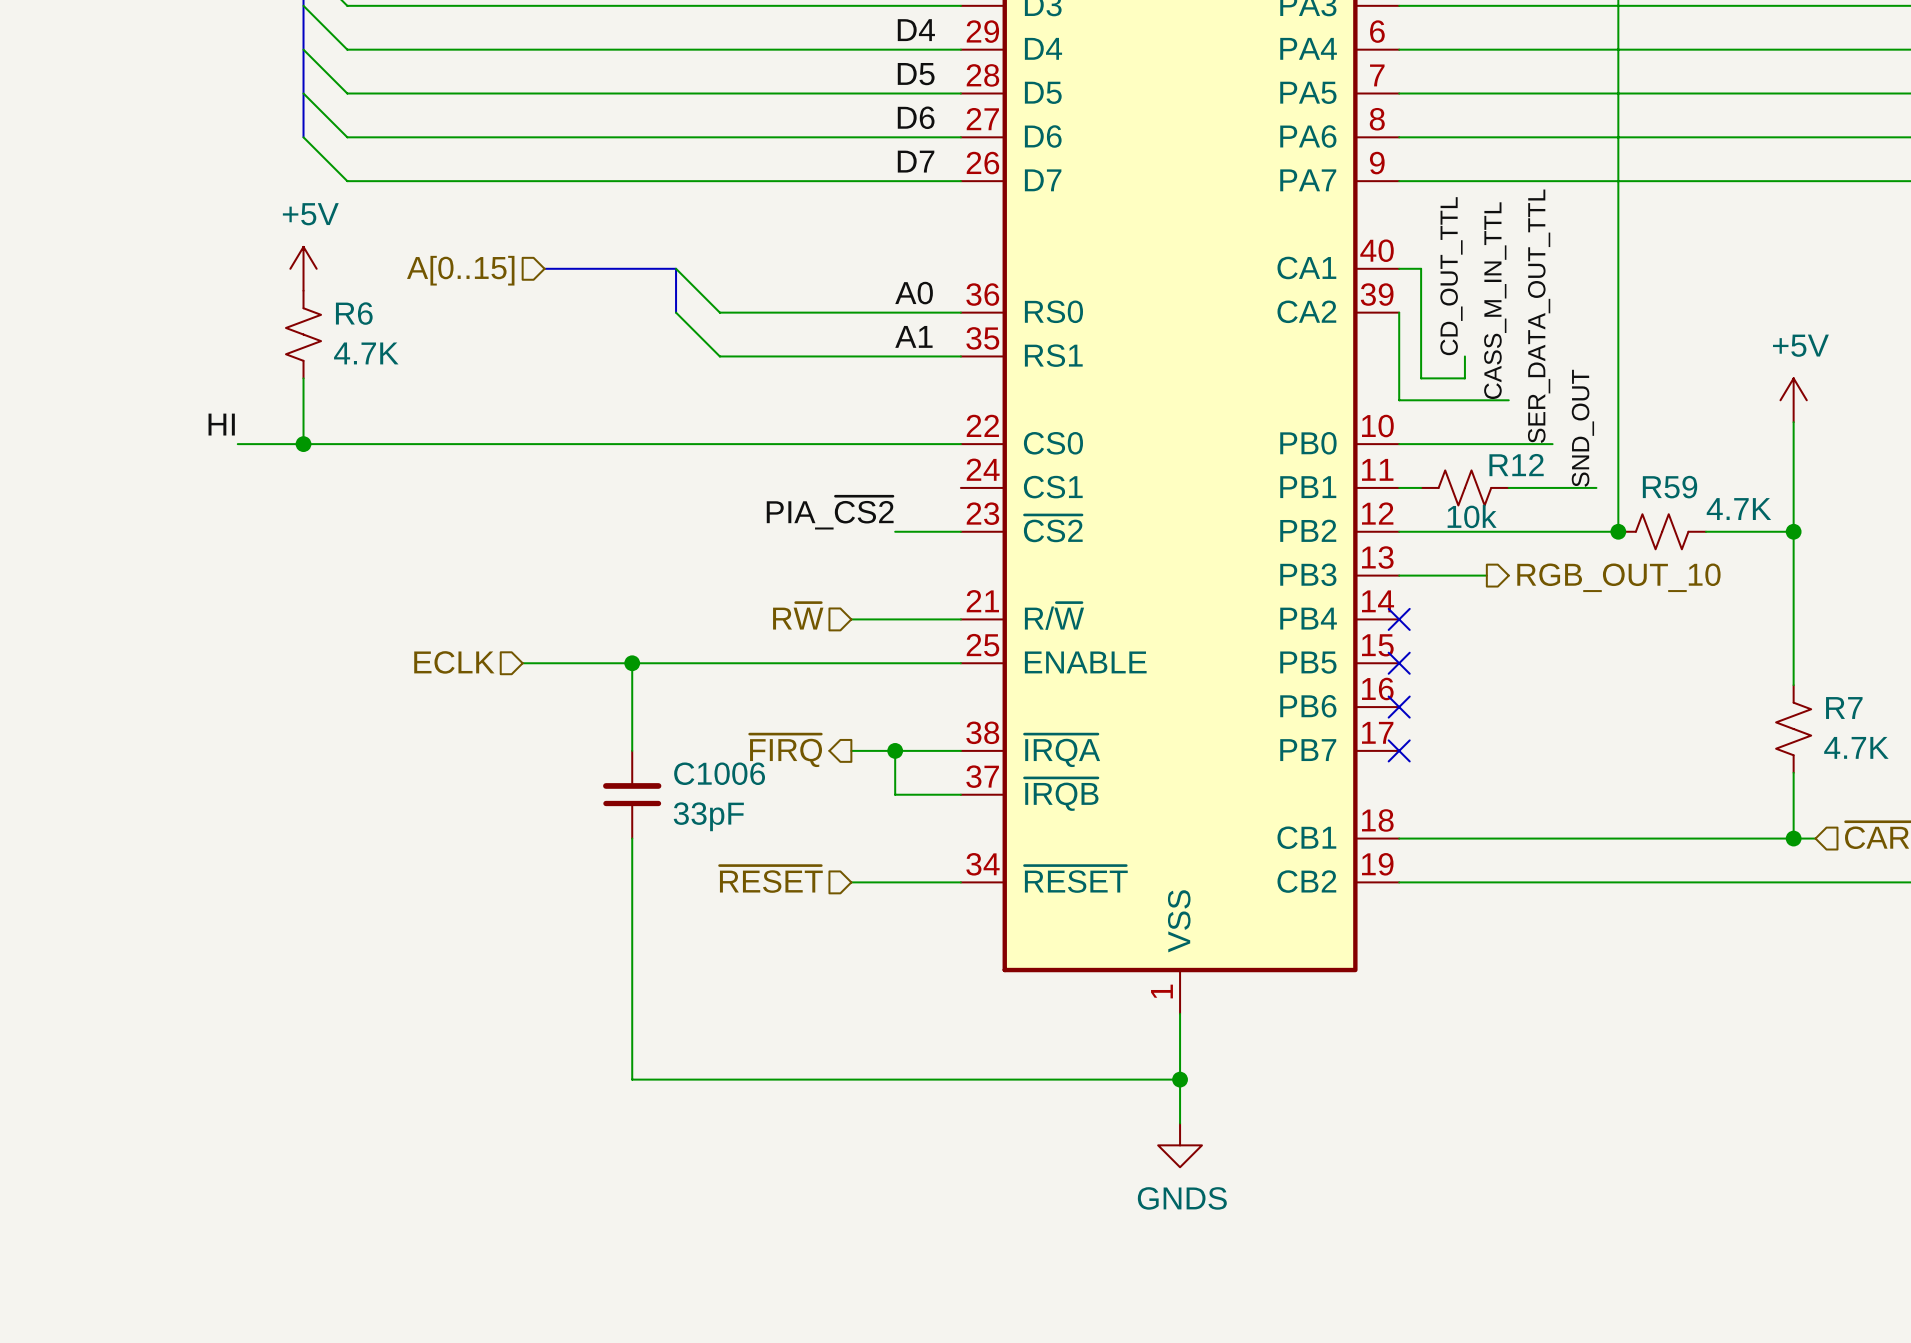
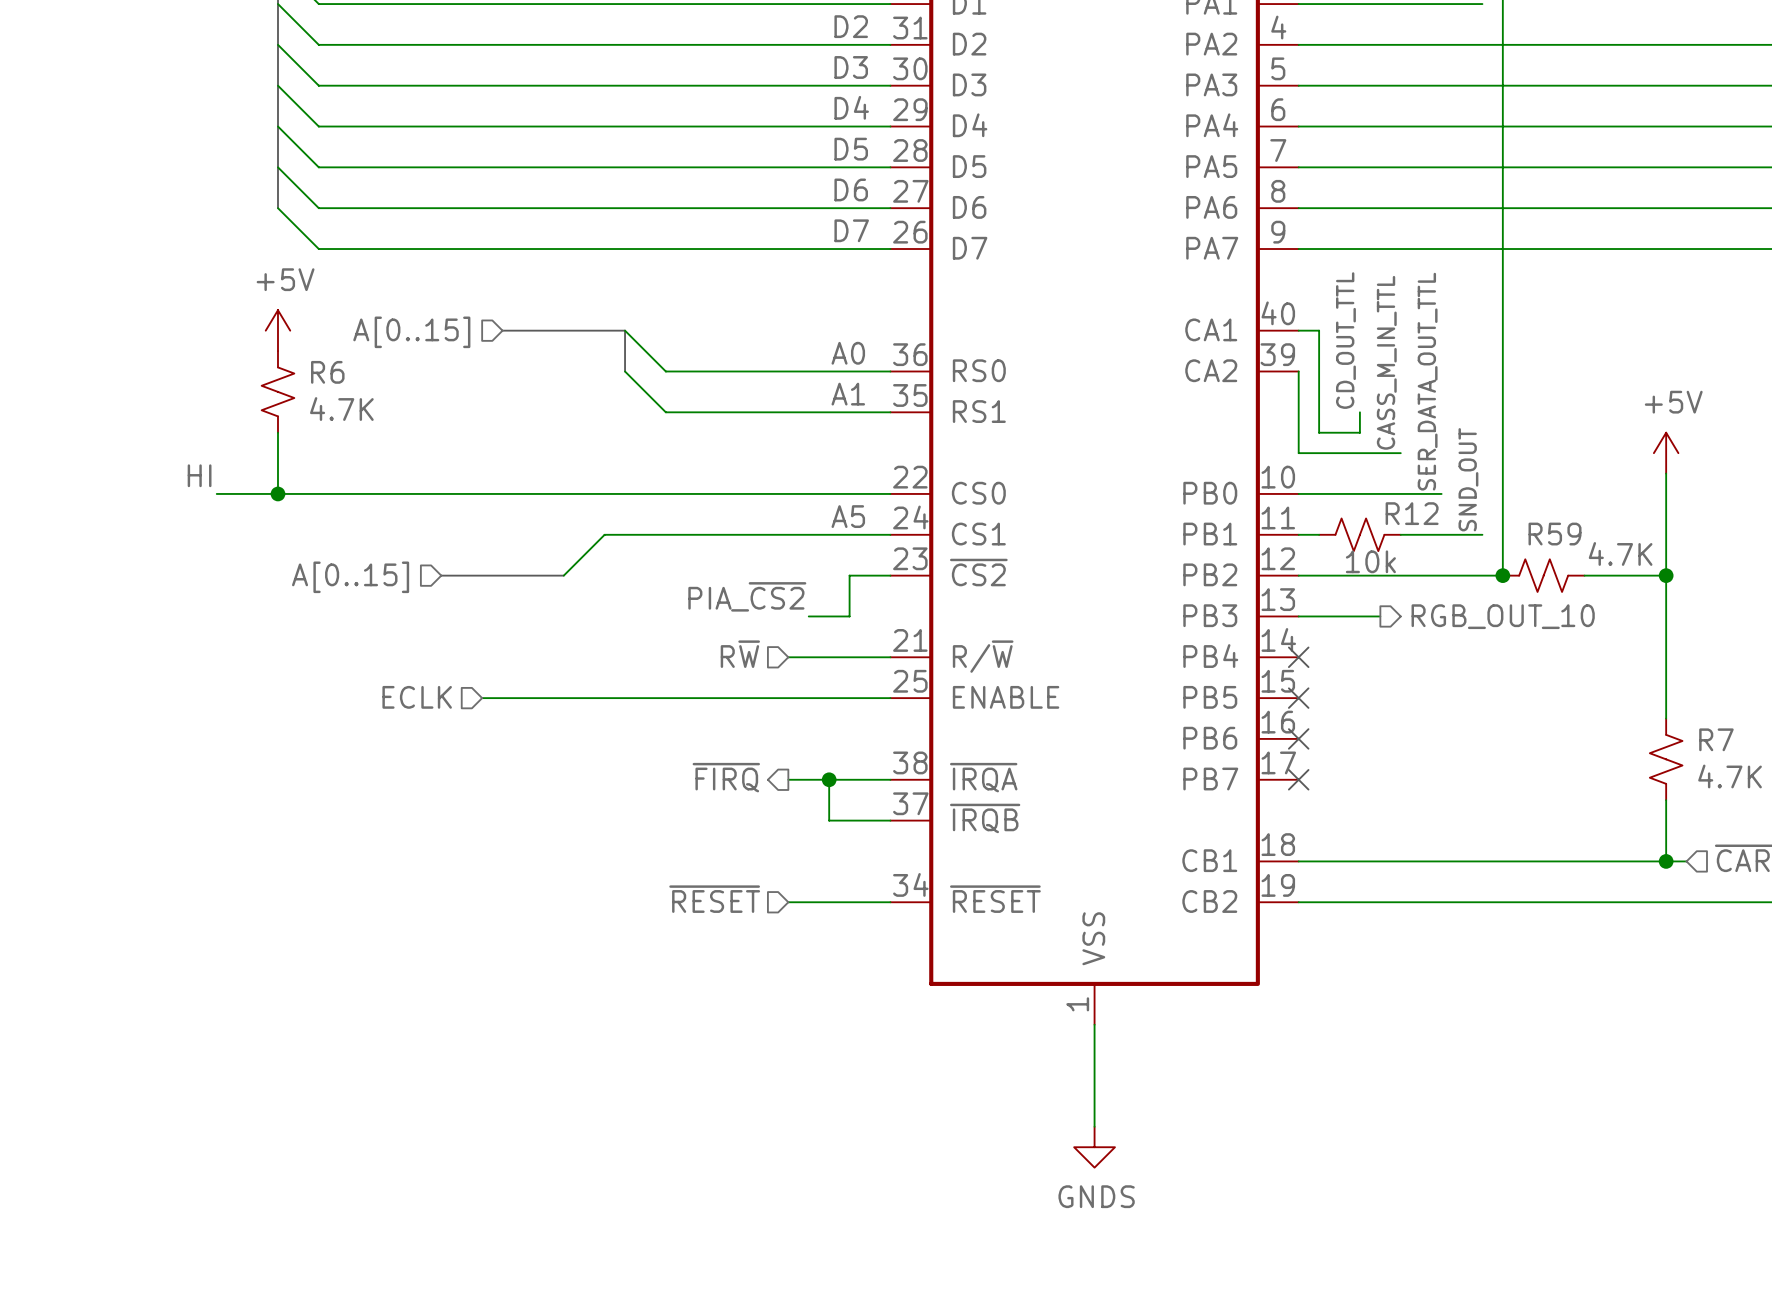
label: none -> A5 (848, 516)
wire: none -> (890, 534) (604, 534) (563, 575)
label position: PIA_~{CS2} (830, 512) -> PIA_~{CS2} (747, 596)
bus: none -> (441, 575) (563, 575)
wire: (895, 531) (917, 531) -> (808, 616) (849, 616) (849, 575)
hierarchical label: none -> A[0..15] (350, 577)
wire: (632, 663) (632, 750) -> none
junction: (632, 663) -> none
C1006: 33pF (632, 794) -> none
wire: (632, 838) (632, 1079) (1180, 1079) -> none
junction: (1180, 1079) -> none

